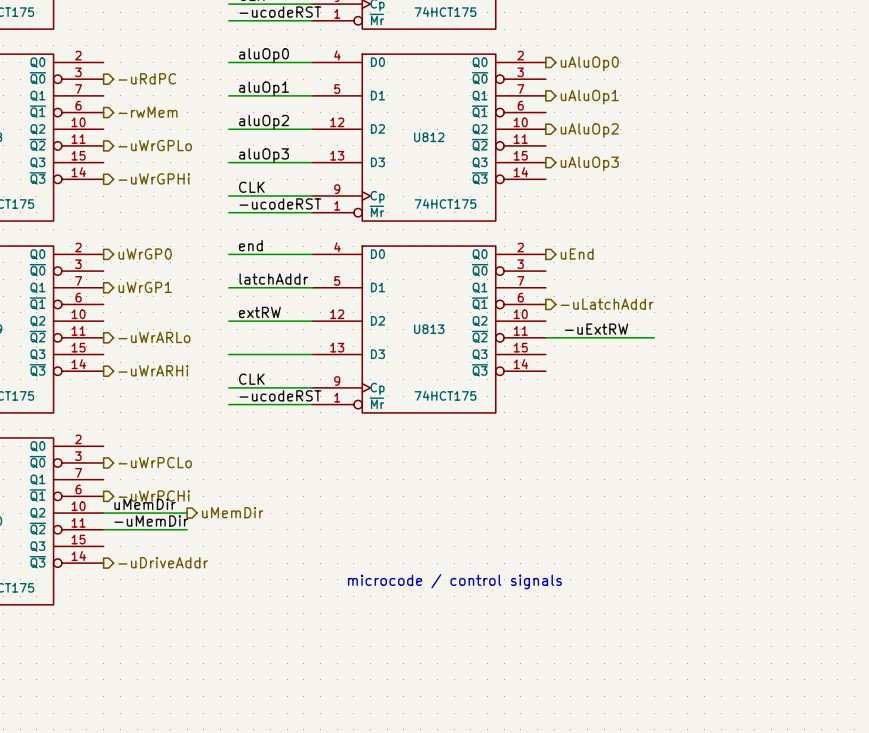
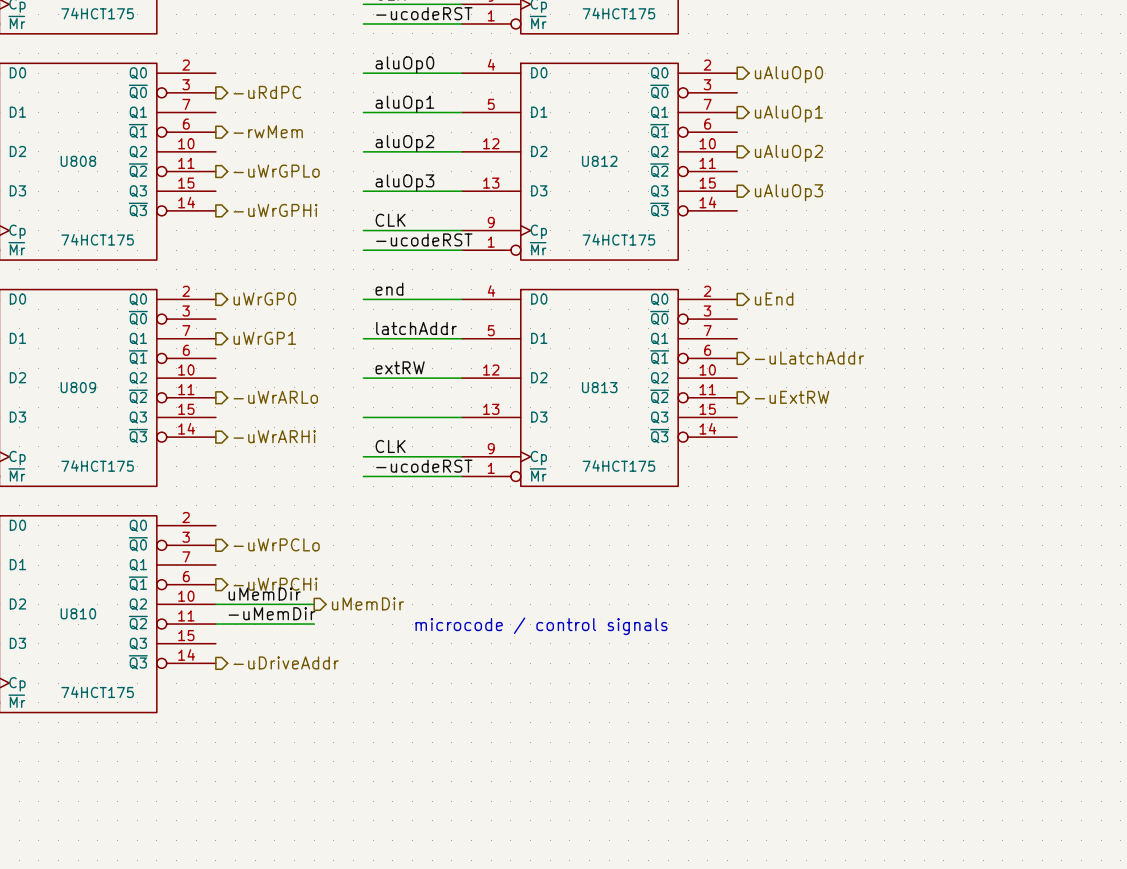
label: -uExtRW (596, 329) -> none
wire: (545, 337) (654, 337) -> none
hierarchical label: none -> -uExtRW (792, 397)
text position: microcode / control signals (454, 581) -> microcode / control signals (541, 626)

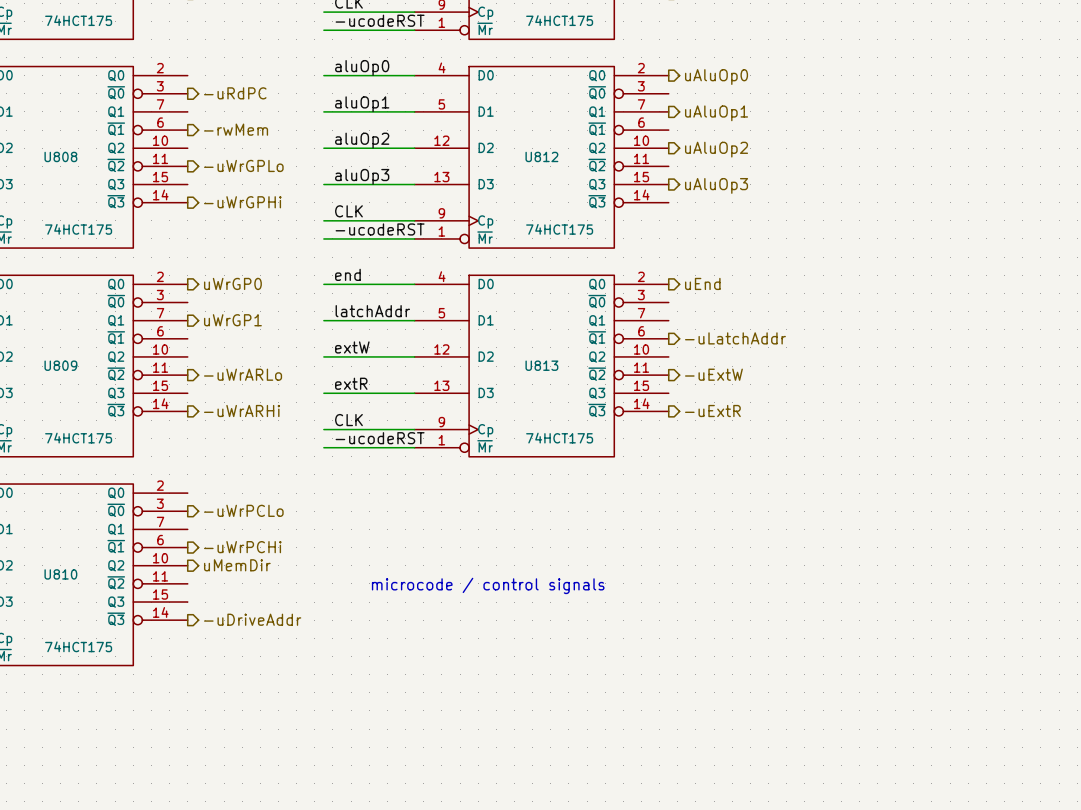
label: extRW (400, 367) -> extW (352, 347)
hierarchical label: -uExtRW (792, 397) -> -uExtW (713, 374)
label: none -> extR (351, 383)
hierarchical label: none -> -uExtR (712, 411)
label: uMemDir (264, 594) -> none
hierarchical label position: uMemDir (367, 603) -> uMemDir (237, 565)
wire: (215, 604) (314, 604) -> none
label: -uMemDir (272, 613) -> none
wire: (215, 624) (314, 624) -> none

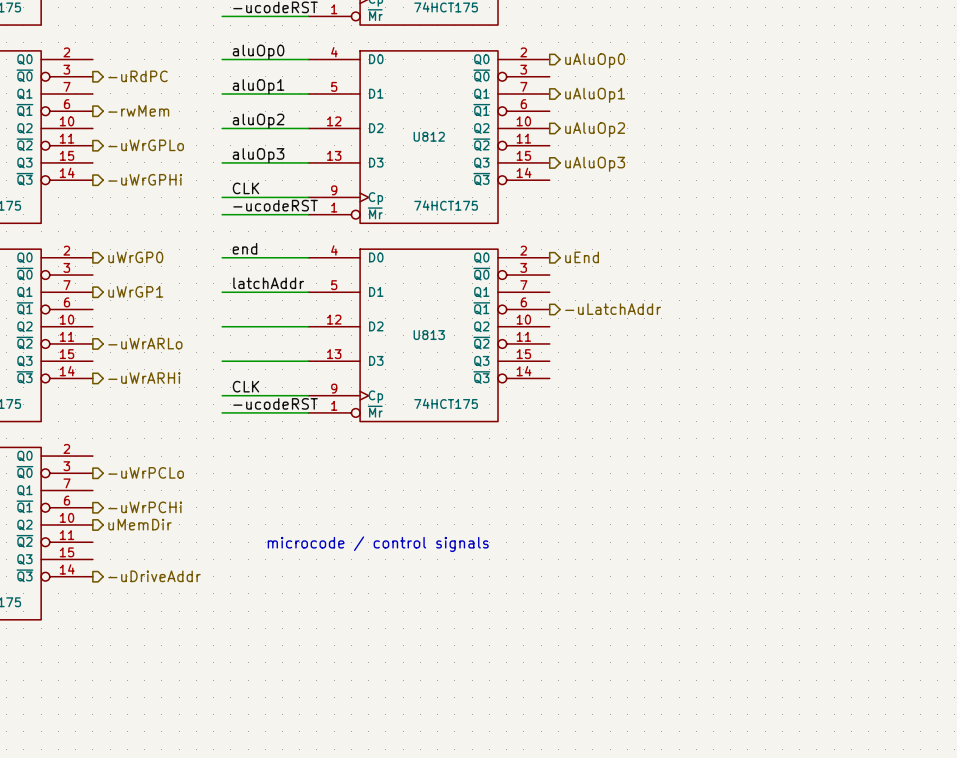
label: extW (352, 347) -> none
hierarchical label: -uExtW (713, 374) -> none
label: extR (351, 383) -> none
hierarchical label: -uExtR (712, 411) -> none

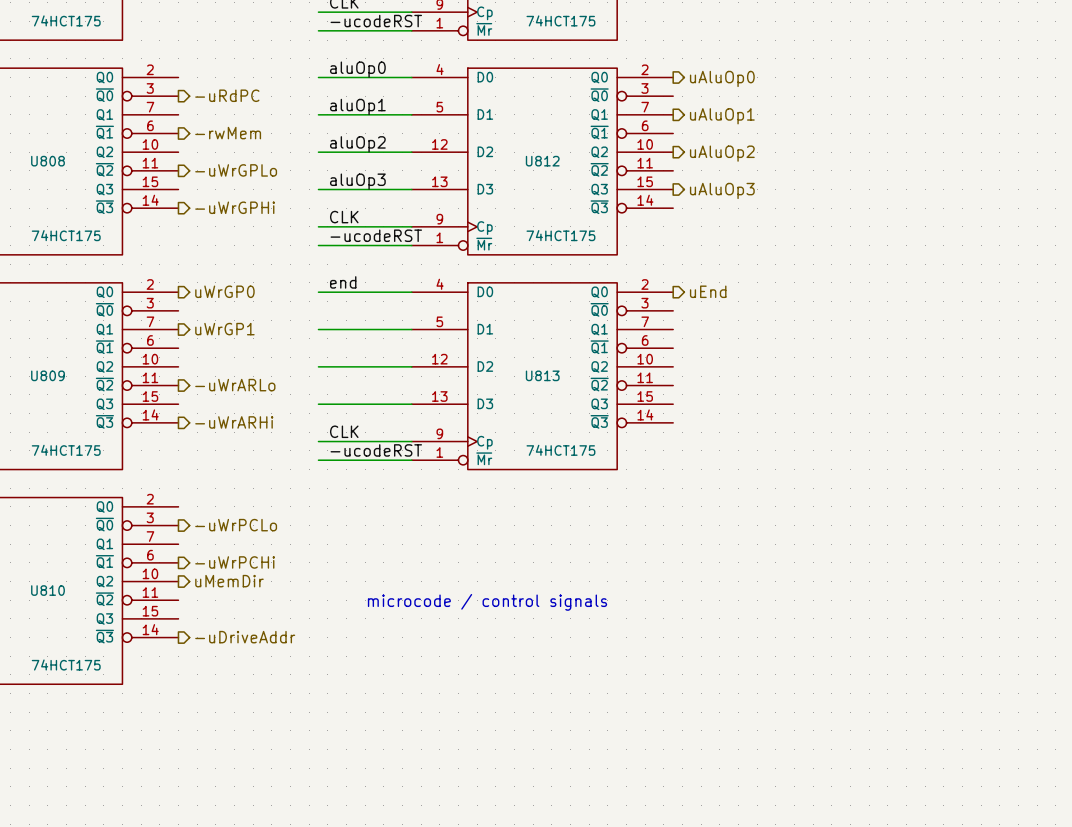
label: latchAddr (268, 283) -> none
hierarchical label: -uLatchAddr (613, 309) -> none

